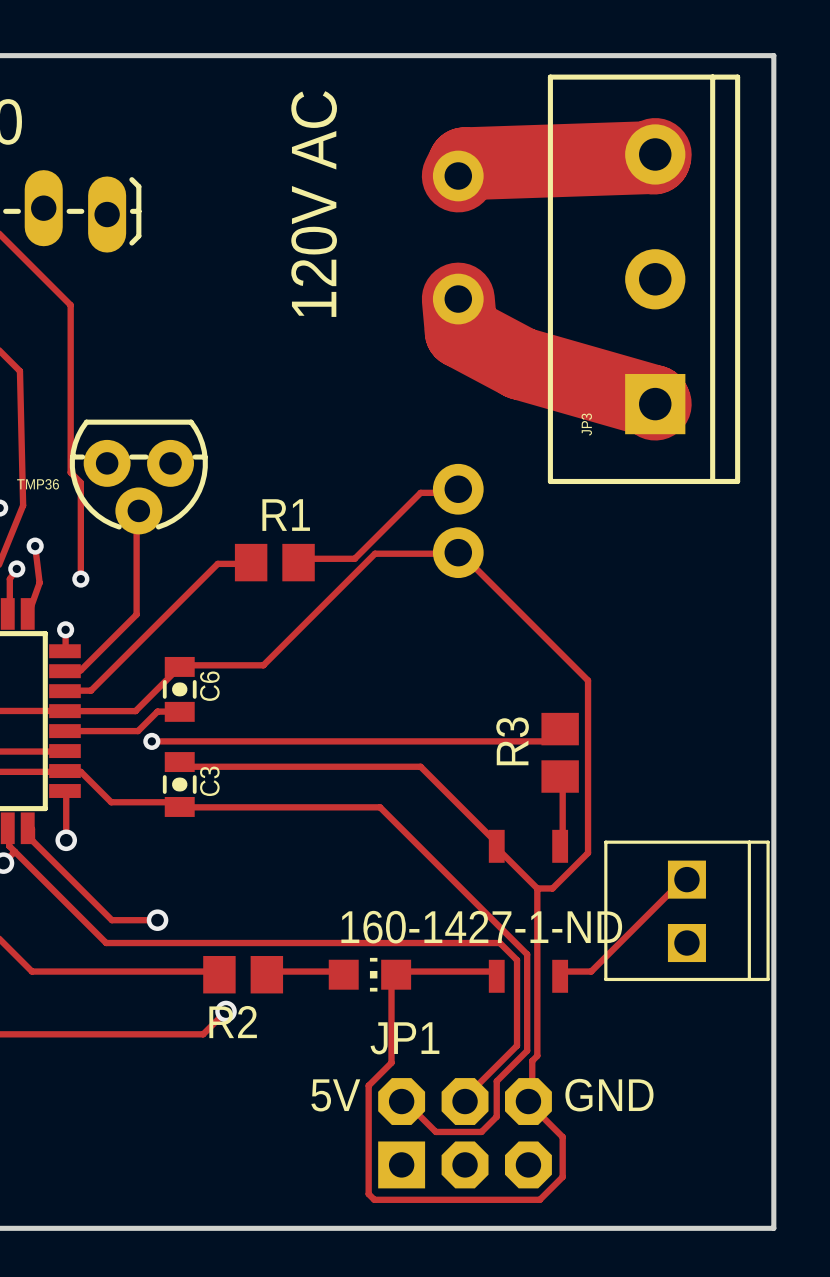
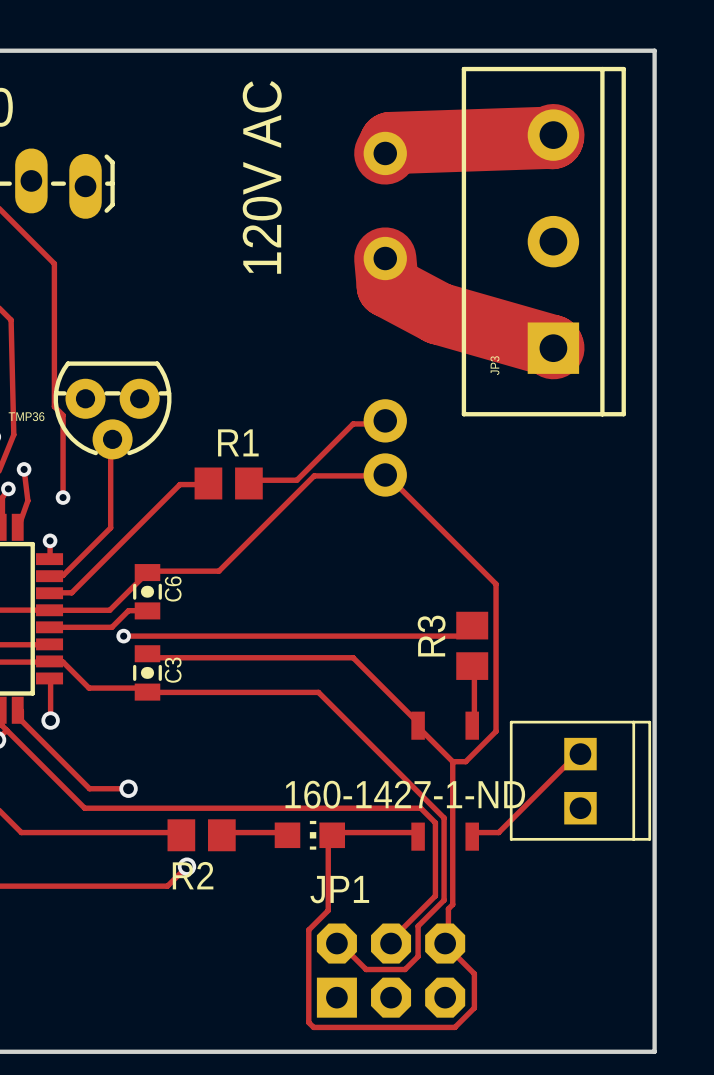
text: 5V (335, 1095) -> none
text: GND (609, 1095) -> none

